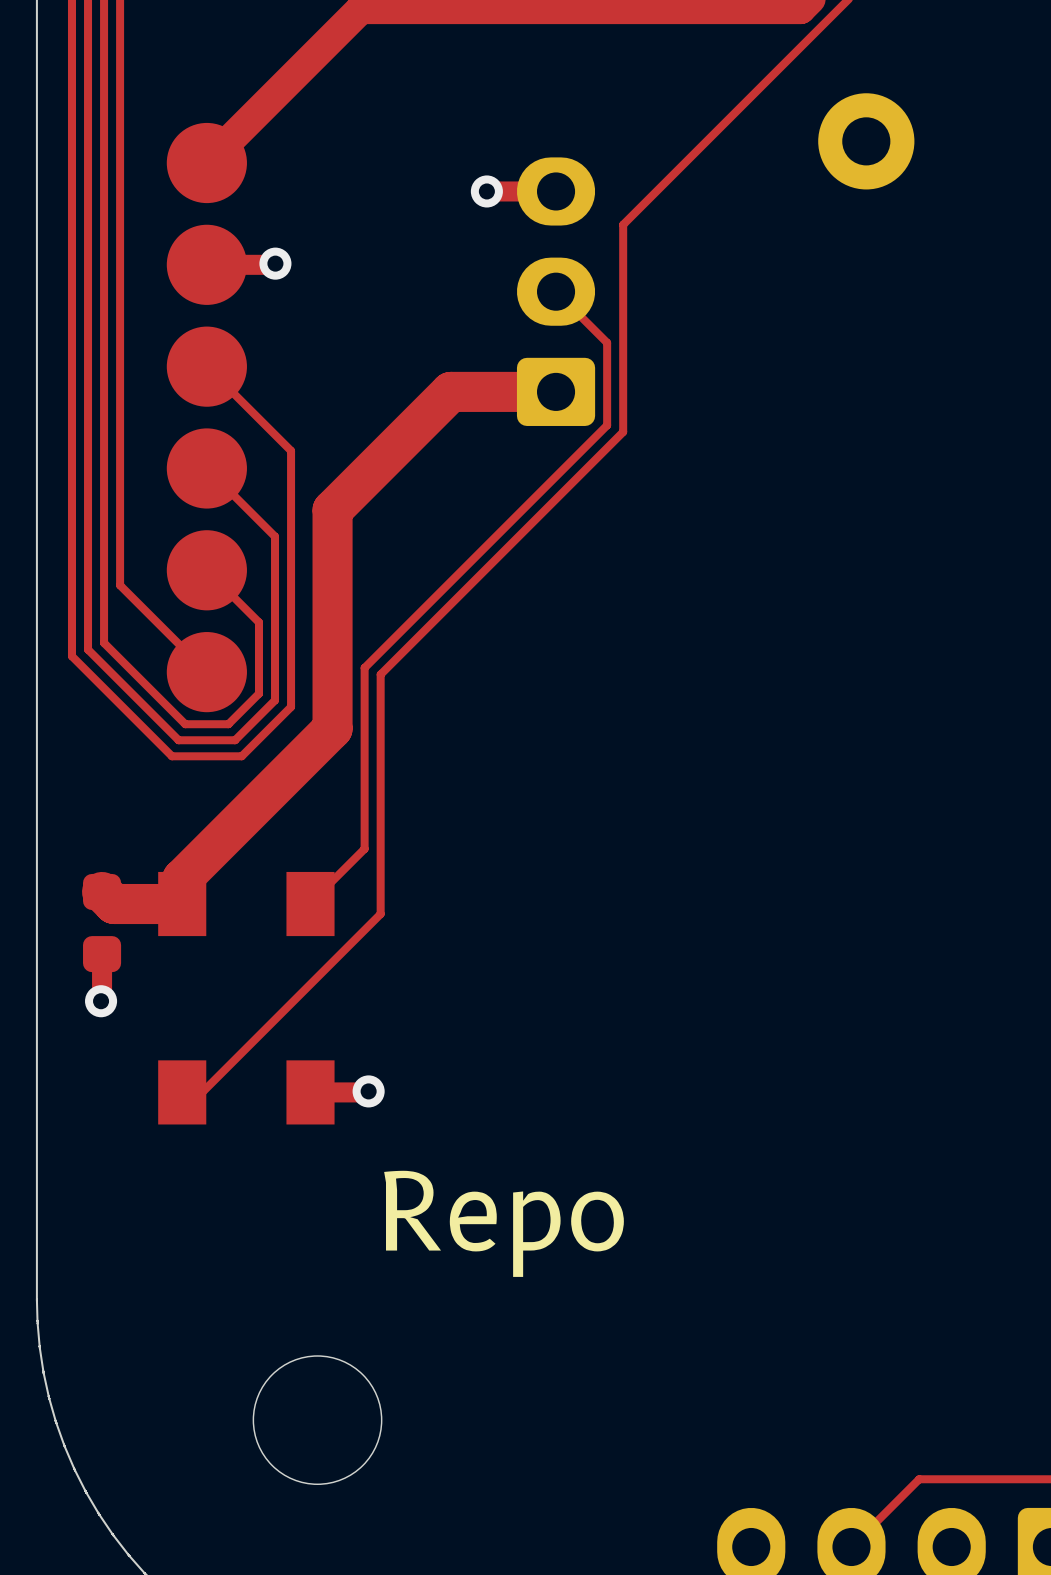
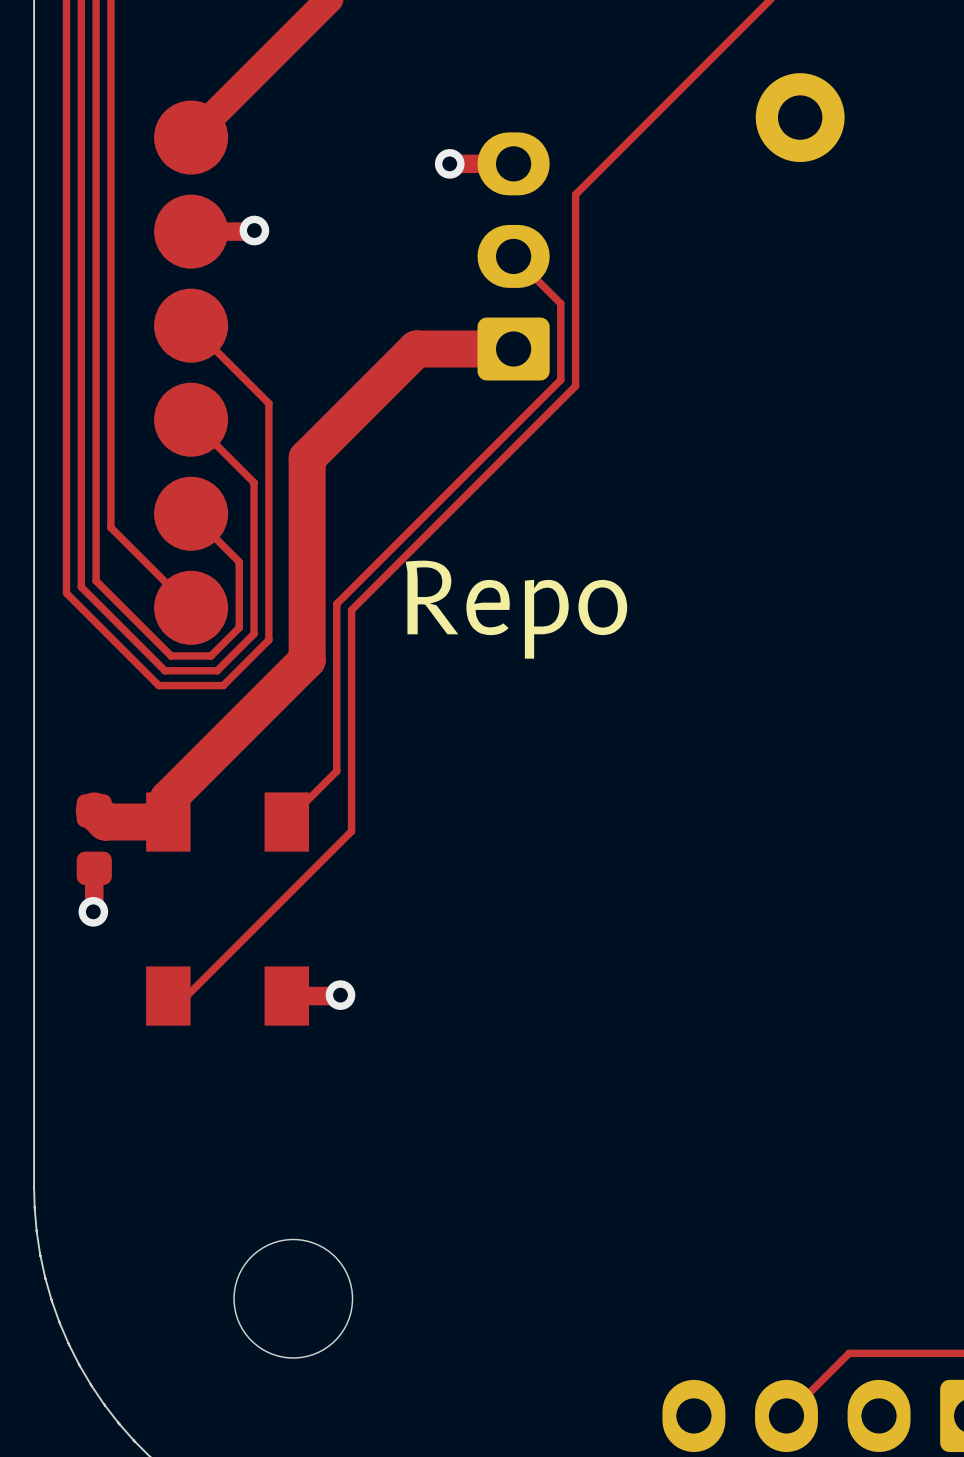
text position: Repo (504, 1223) -> Repo (516, 609)

